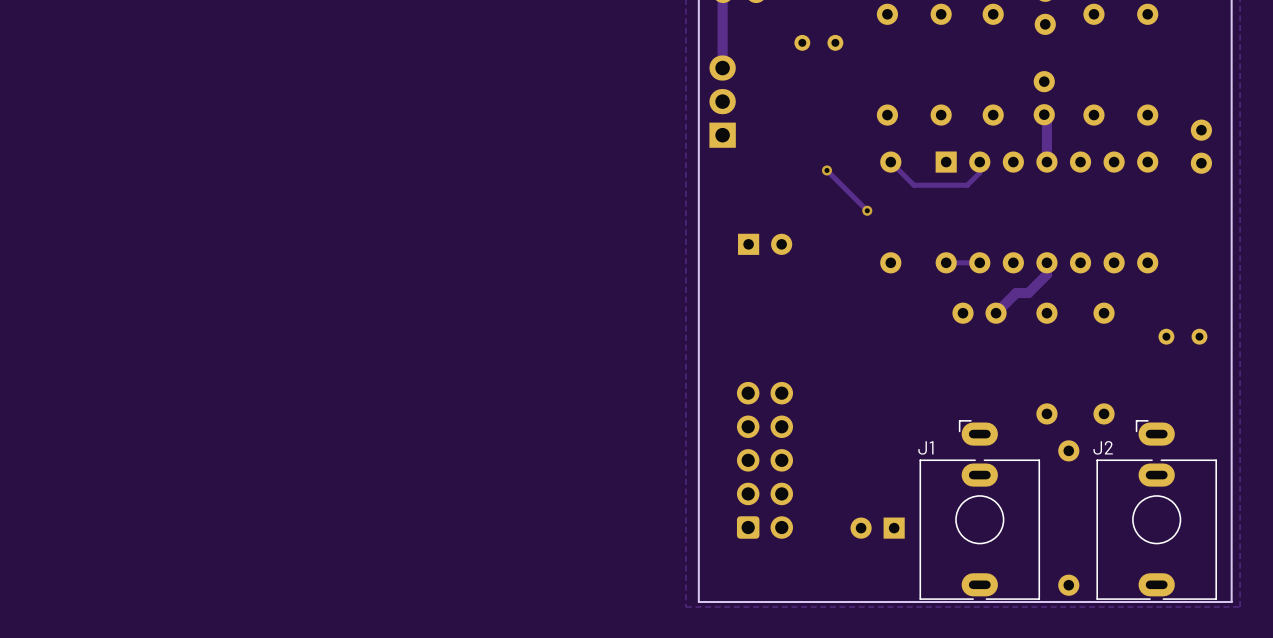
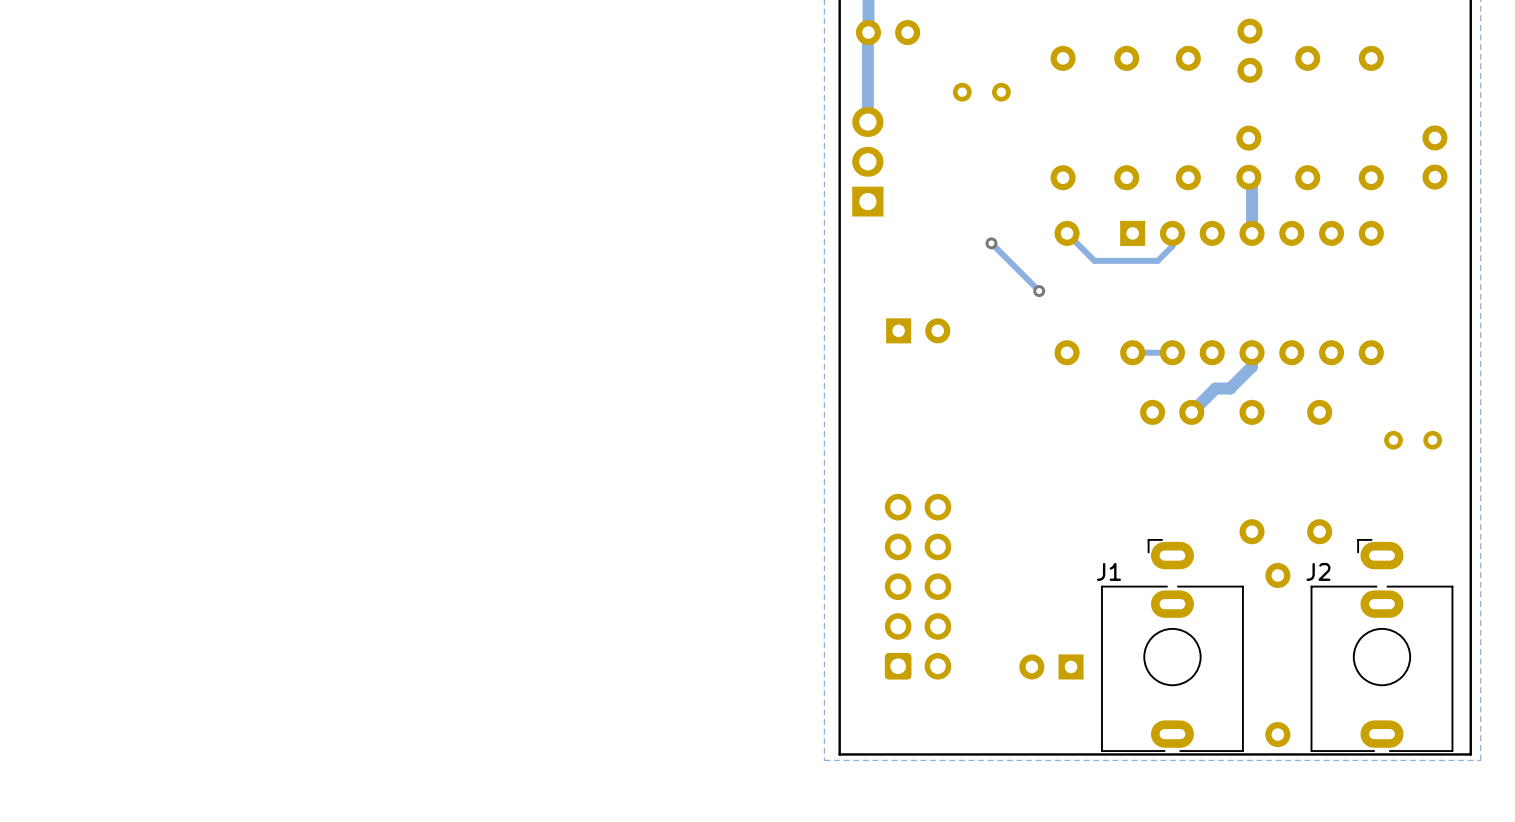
part position: (1201, 146) -> (1434, 157)

